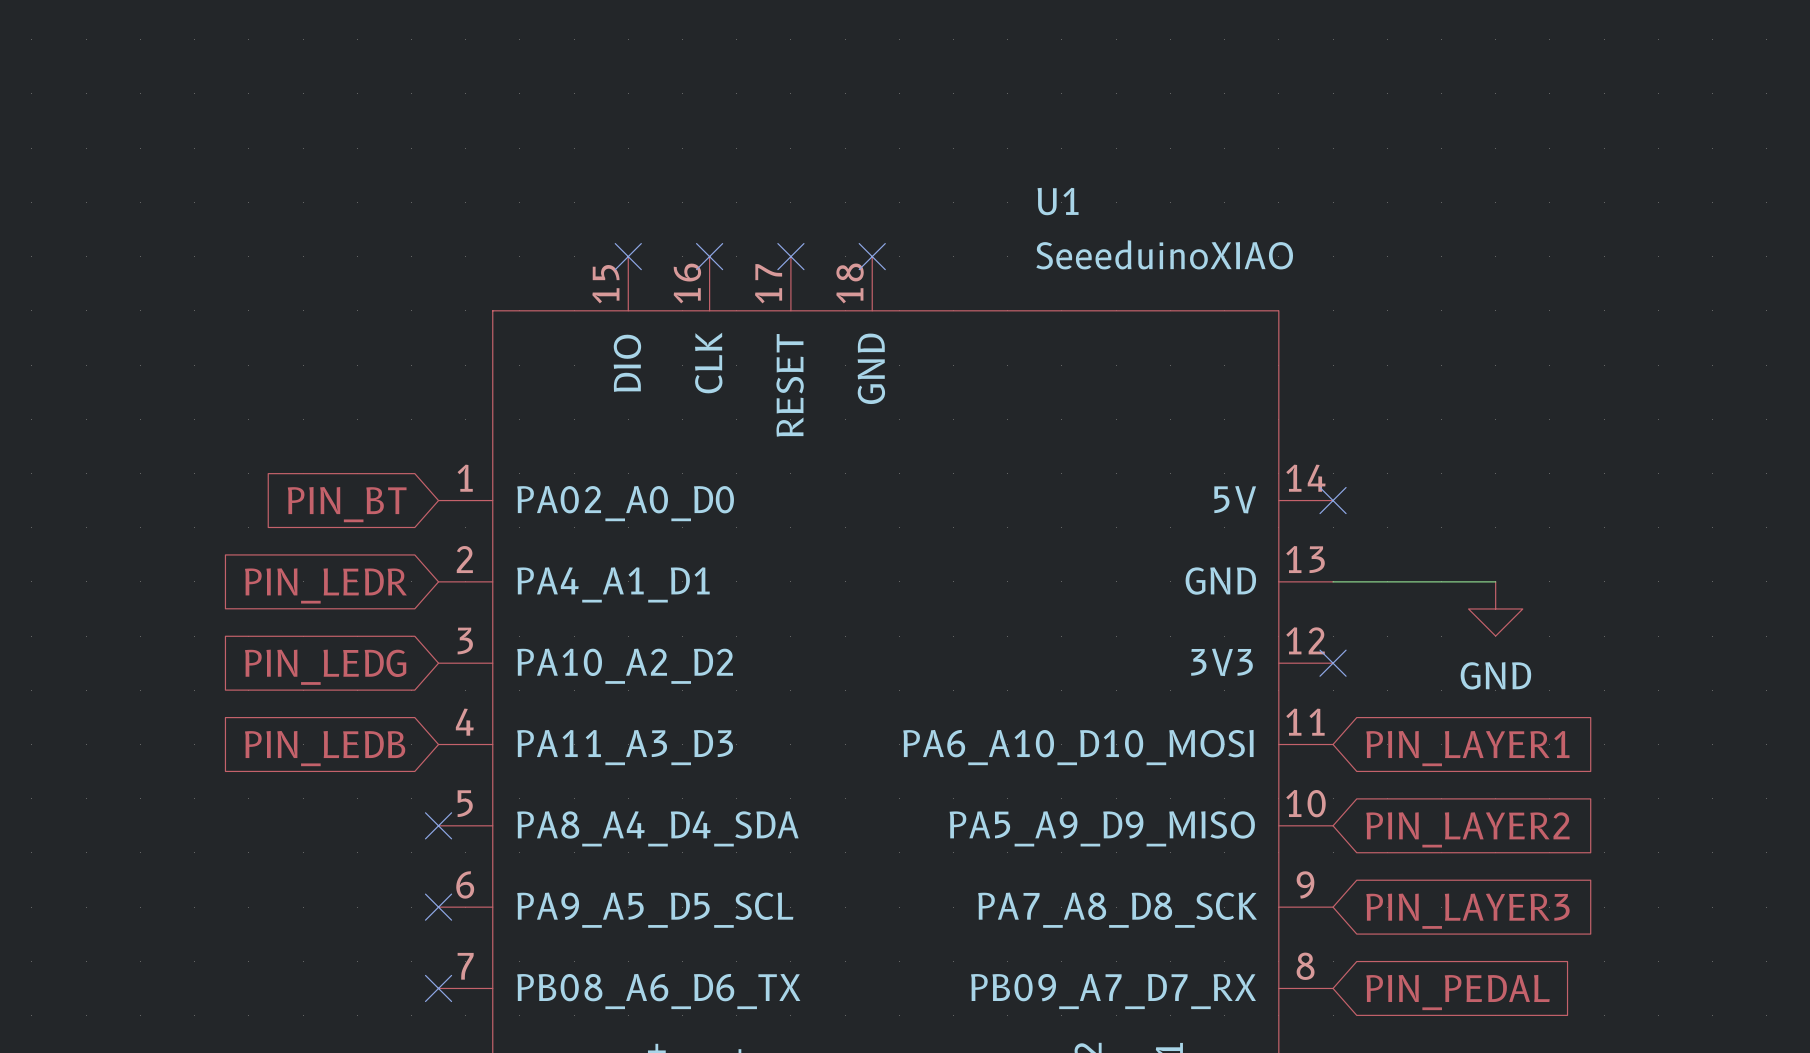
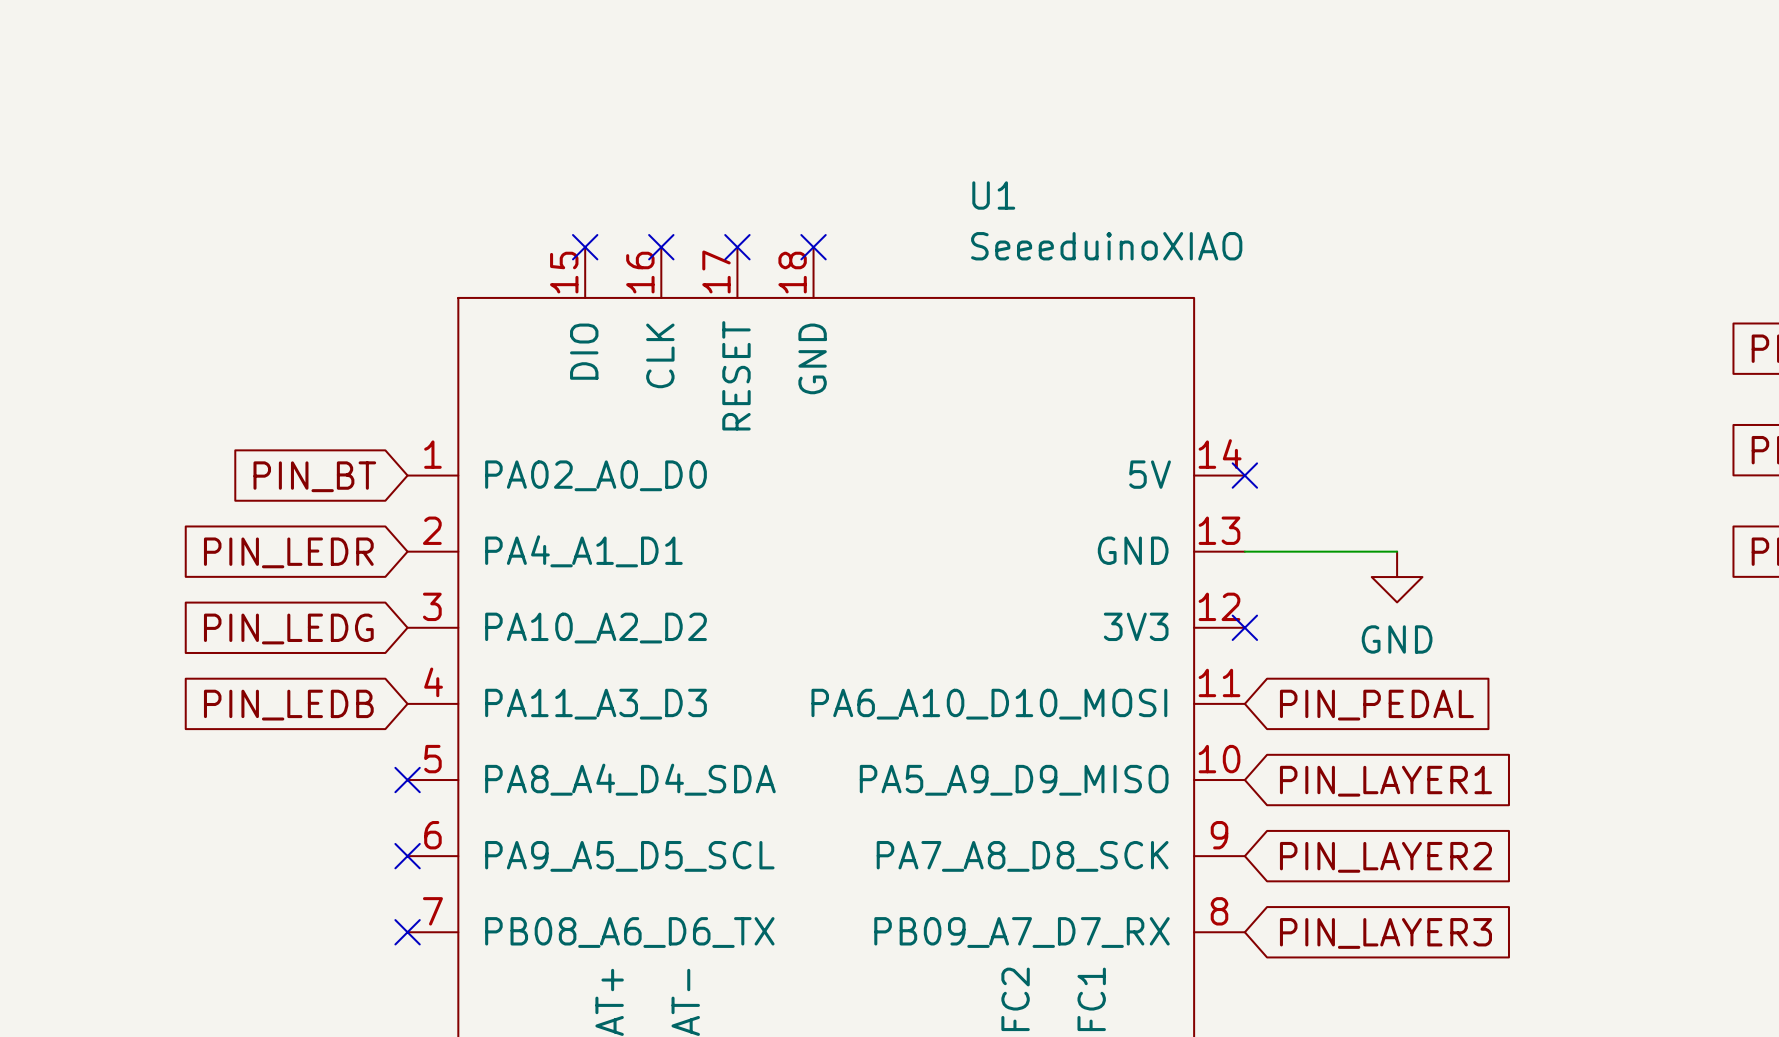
global label: PIN_LAYER1 (1467, 748) -> PIN_PEDAL (1376, 705)
global label: PIN_LAYER2 (1467, 829) -> PIN_LAYER1 (1385, 781)
global label: PIN_LAYER3 (1467, 911) -> PIN_LAYER2 (1385, 857)
global label: PIN_PEDAL (1457, 992) -> PIN_LAYER3 (1385, 933)

